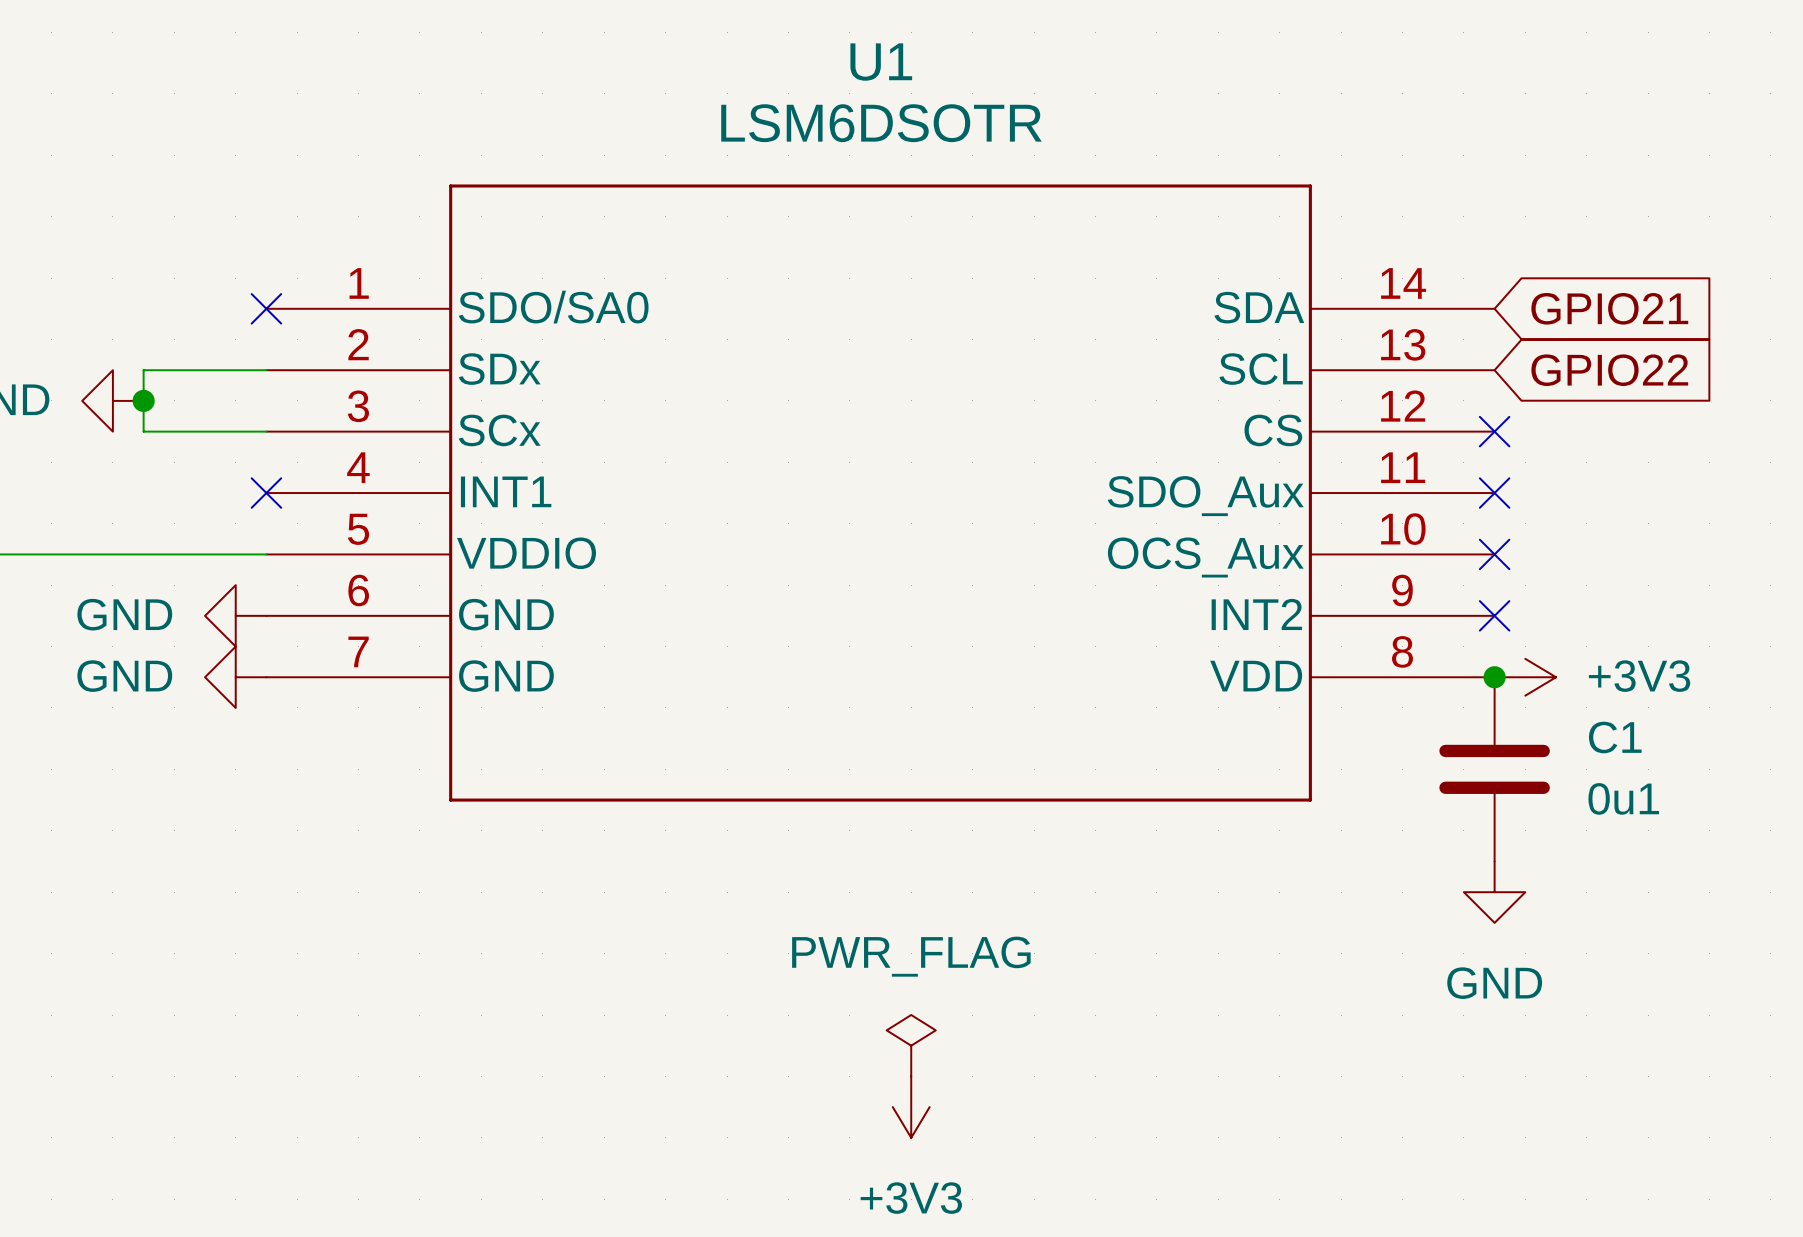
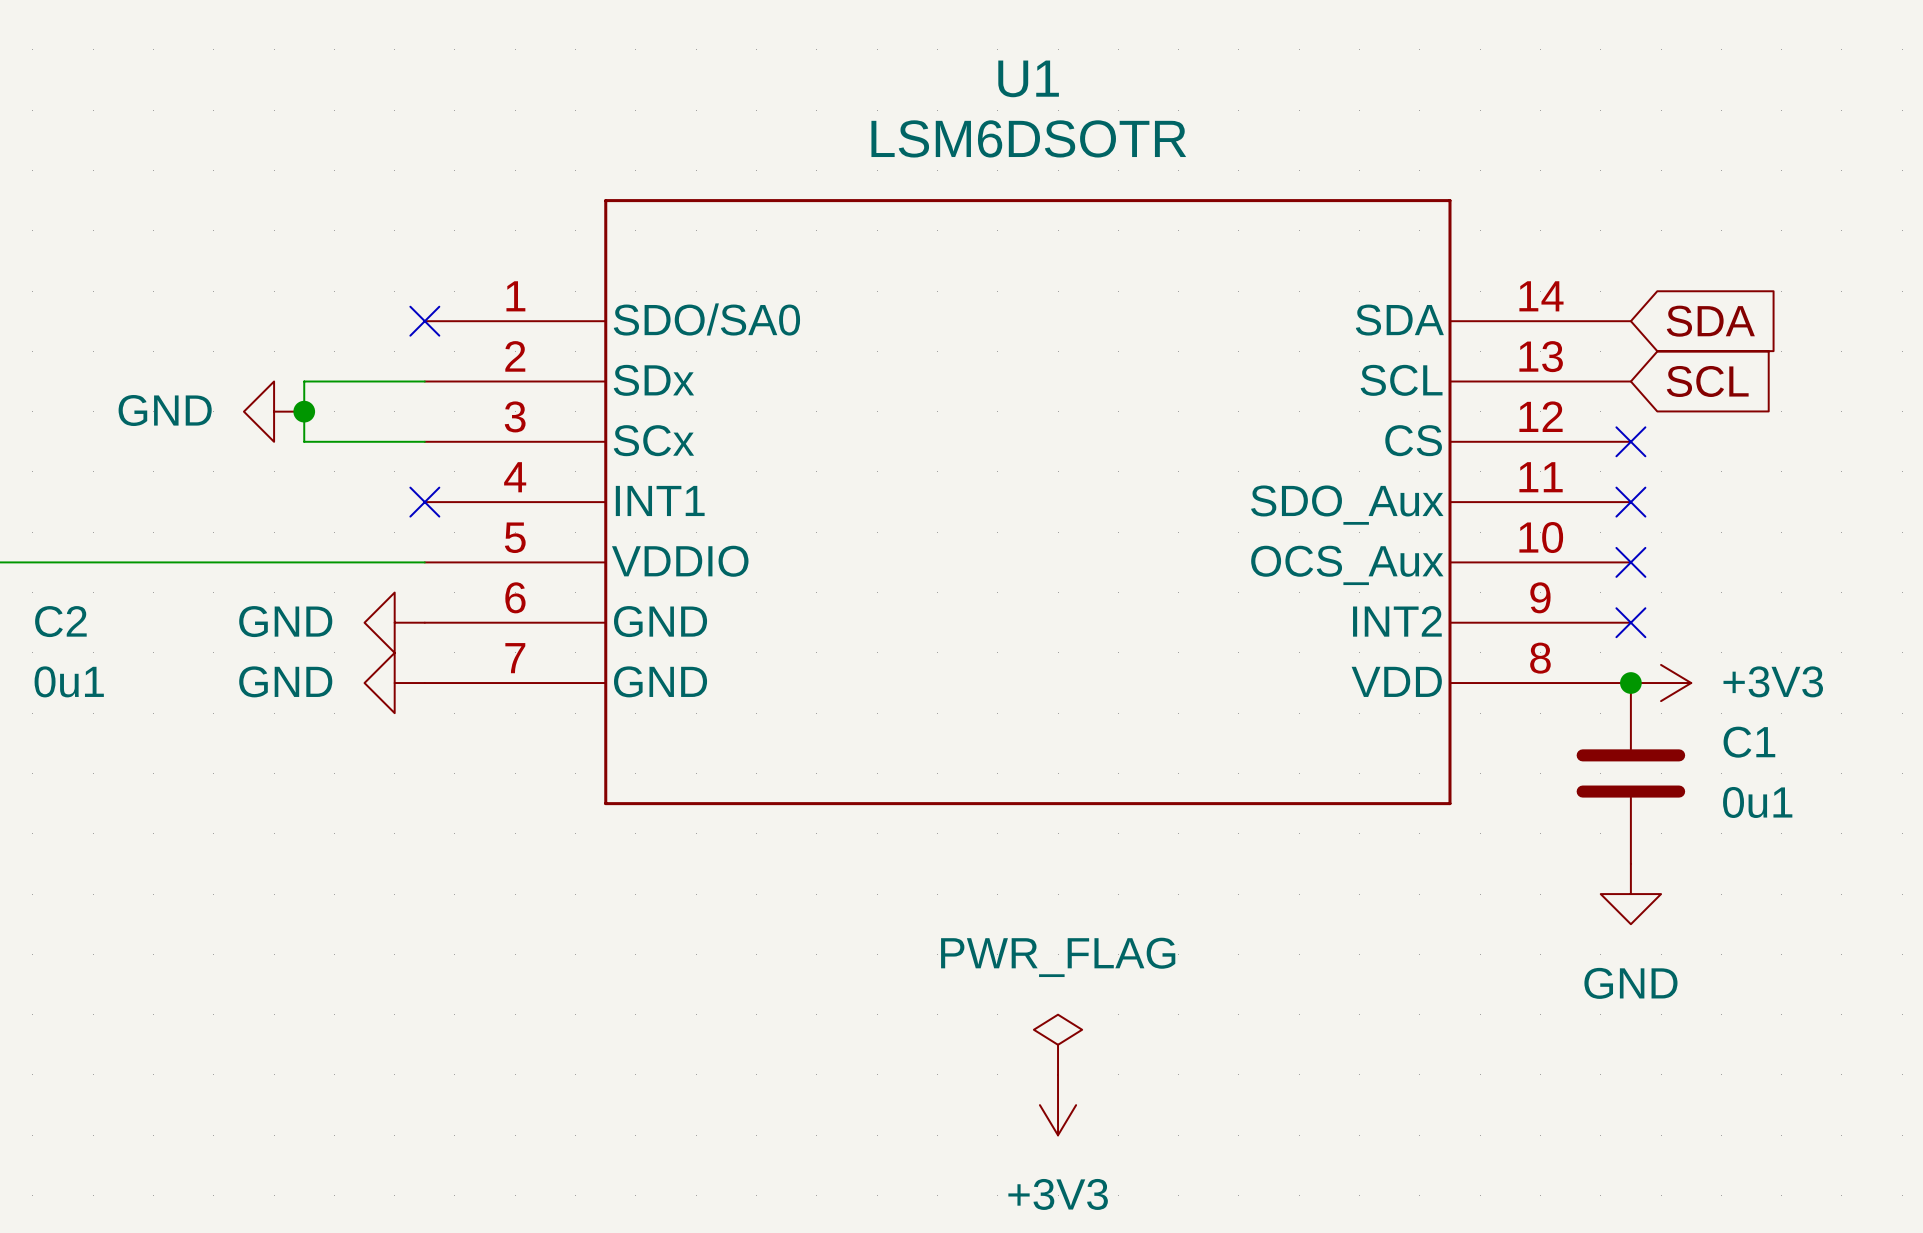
global label: GPIO21 (1609, 308) -> SDA (1710, 321)
global label: GPIO22 (1609, 370) -> SCL (1707, 381)

